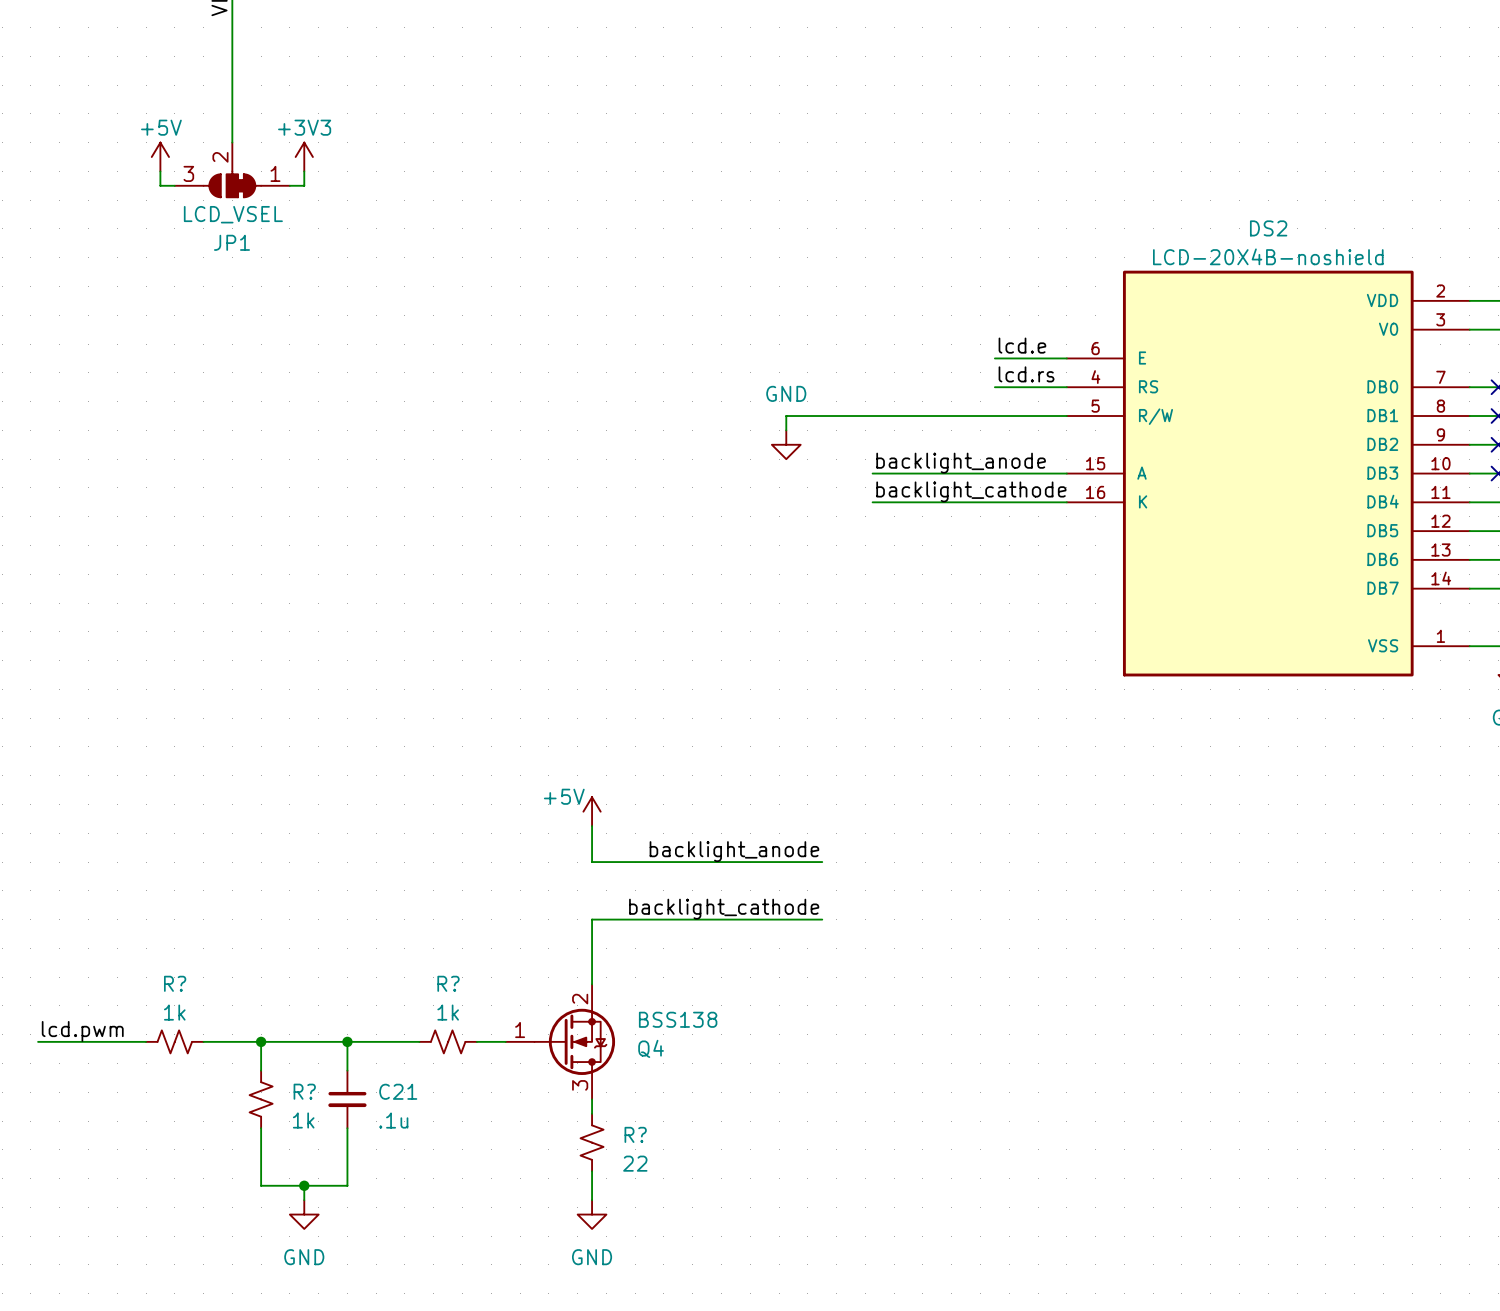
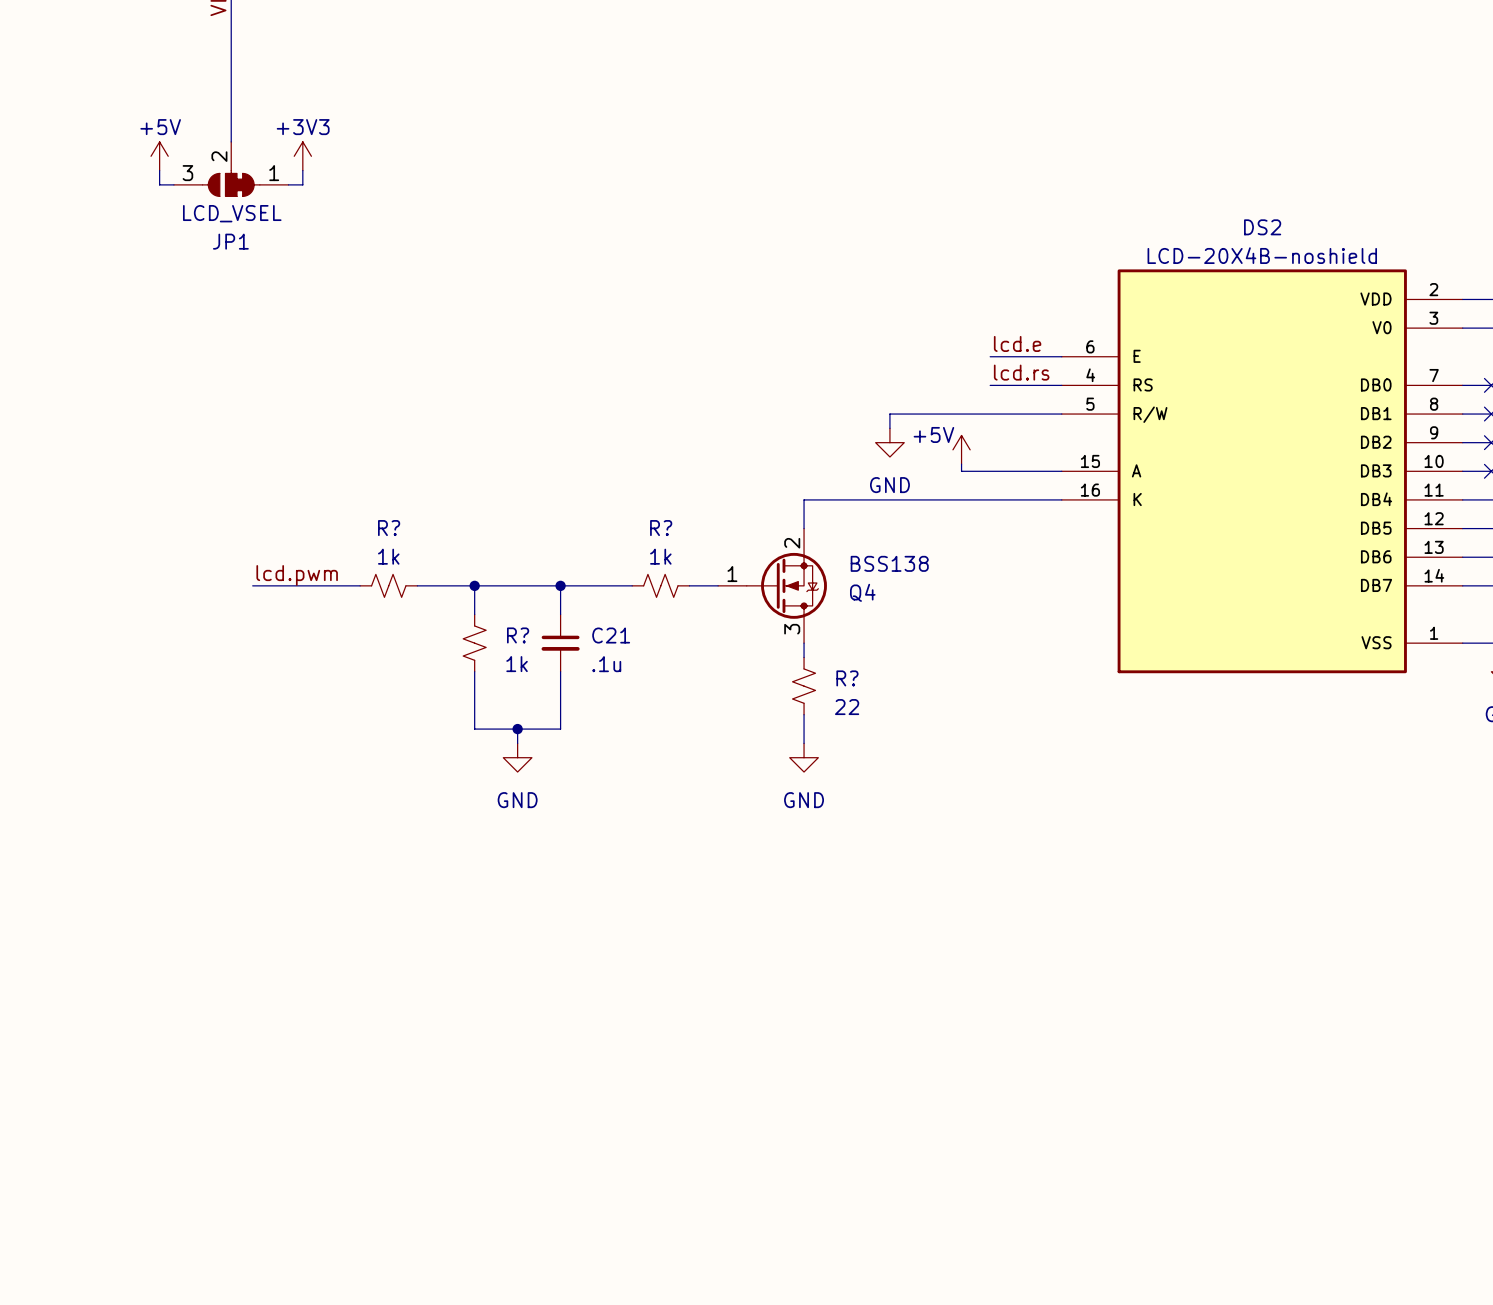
power symbol text position: GND (786, 393) -> GND (889, 485)
wire: (894, 416) (786, 416) (786, 430) -> (889, 414) (889, 428)
power symbol position: GND (786, 444) -> GND (889, 442)
power symbol: none -> +5V (961, 449)
label: backlight_anode (961, 463) -> none
wire: (872, 473) (966, 473) -> (961, 464) (961, 471)
label: backlight_cathode (971, 491) -> none
wire: none -> (868, 499) (804, 499) (804, 528)
label: none -> lcd.pwm (297, 575)
wire: none -> (252, 585) (360, 585)
R?: none -> 1k (388, 585)
wire: none -> (417, 585) (632, 585)
wire: none -> (474, 585) (474, 614)
junction: none -> (474, 585)
wire: none -> (560, 585) (560, 614)
junction: none -> (560, 585)
R?: none -> 1k (660, 585)
wire: none -> (689, 585) (718, 585)
R?: none -> 1k (474, 643)
wire: none -> (804, 643) (804, 657)
wire: none -> (474, 671) (474, 729) (560, 729) (560, 671)
R?: none -> 22 (804, 686)
wire: none -> (804, 714) (804, 743)
wire: none -> (517, 729) (517, 743)
junction: none -> (517, 729)
power symbol: none -> GND (517, 757)
power symbol: none -> GND (804, 757)
power symbol: +5V (592, 811) -> none
wire: (592, 826) (592, 862) (822, 862) -> none
label: backlight_anode (734, 851) -> none
label: backlight_cathode (724, 909) -> none
wire: (822, 919) (592, 919) (592, 984) -> none
label: lcd.pwm (82, 1031) -> none
wire: (38, 1041) (146, 1041) -> none
R?: 1k (174, 1041) -> none
wire: (203, 1041) (419, 1041) -> none
wire: (261, 1041) (261, 1070) -> none
junction: (261, 1041) -> none
wire: (347, 1041) (347, 1070) -> none
junction: (347, 1041) -> none
R?: 1k (448, 1041) -> none
wire: (476, 1041) (505, 1041) -> none
Q4 position: (560, 1041) -> (772, 585)
R?: 1k (261, 1099) -> none
C21 position: (347, 1099) -> (560, 643)
wire: (592, 1099) (592, 1113) -> none
wire: (261, 1128) (261, 1185) (347, 1185) (347, 1128) -> none
R?: 22 (592, 1142) -> none
wire: (592, 1171) (592, 1200) -> none
wire: (304, 1185) (304, 1200) -> none
junction: (304, 1185) -> none
power symbol: GND (304, 1214) -> none
power symbol: GND (592, 1214) -> none

